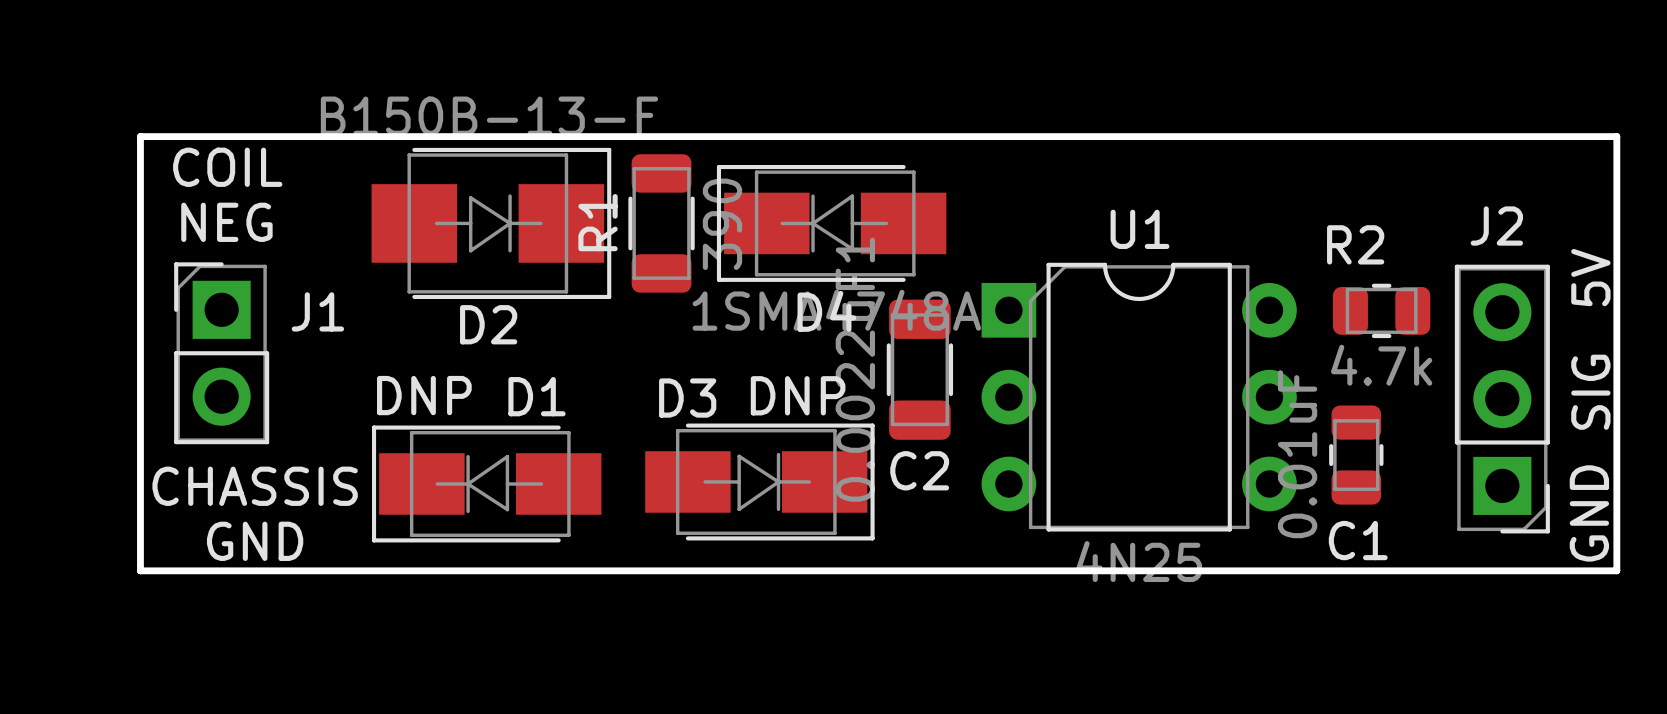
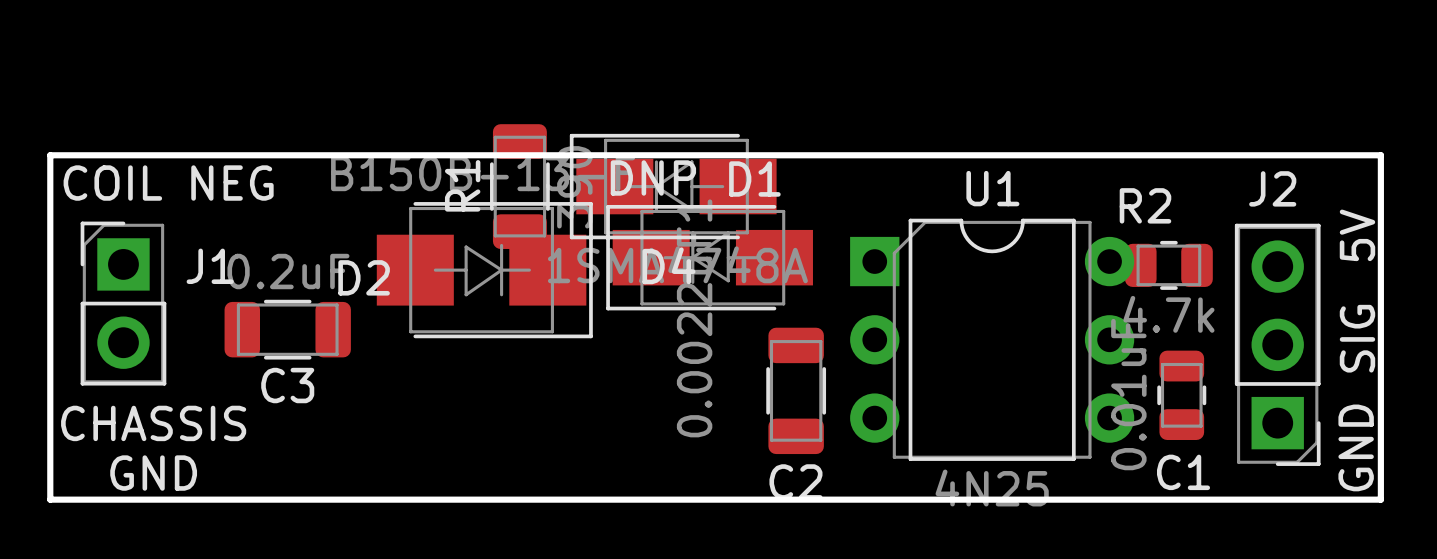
text: COIL (227, 167) -> COIL NEG (168, 183)
board edge: (140, 188) (140, 136) (1616, 136) (1616, 188) -> (50, 155) (1380, 155)
text: NEG (226, 222) -> none
D2 position: (491, 223) -> (484, 270)
C2 position: (919, 369) -> (796, 390)
C3: none -> 0.2uF (287, 329)
U1 position: (1139, 397) -> (992, 339)
C1 position: (1356, 455) -> (1181, 395)
D3: DNP (759, 481) -> none
D1 position: (486, 483) -> (709, 257)

